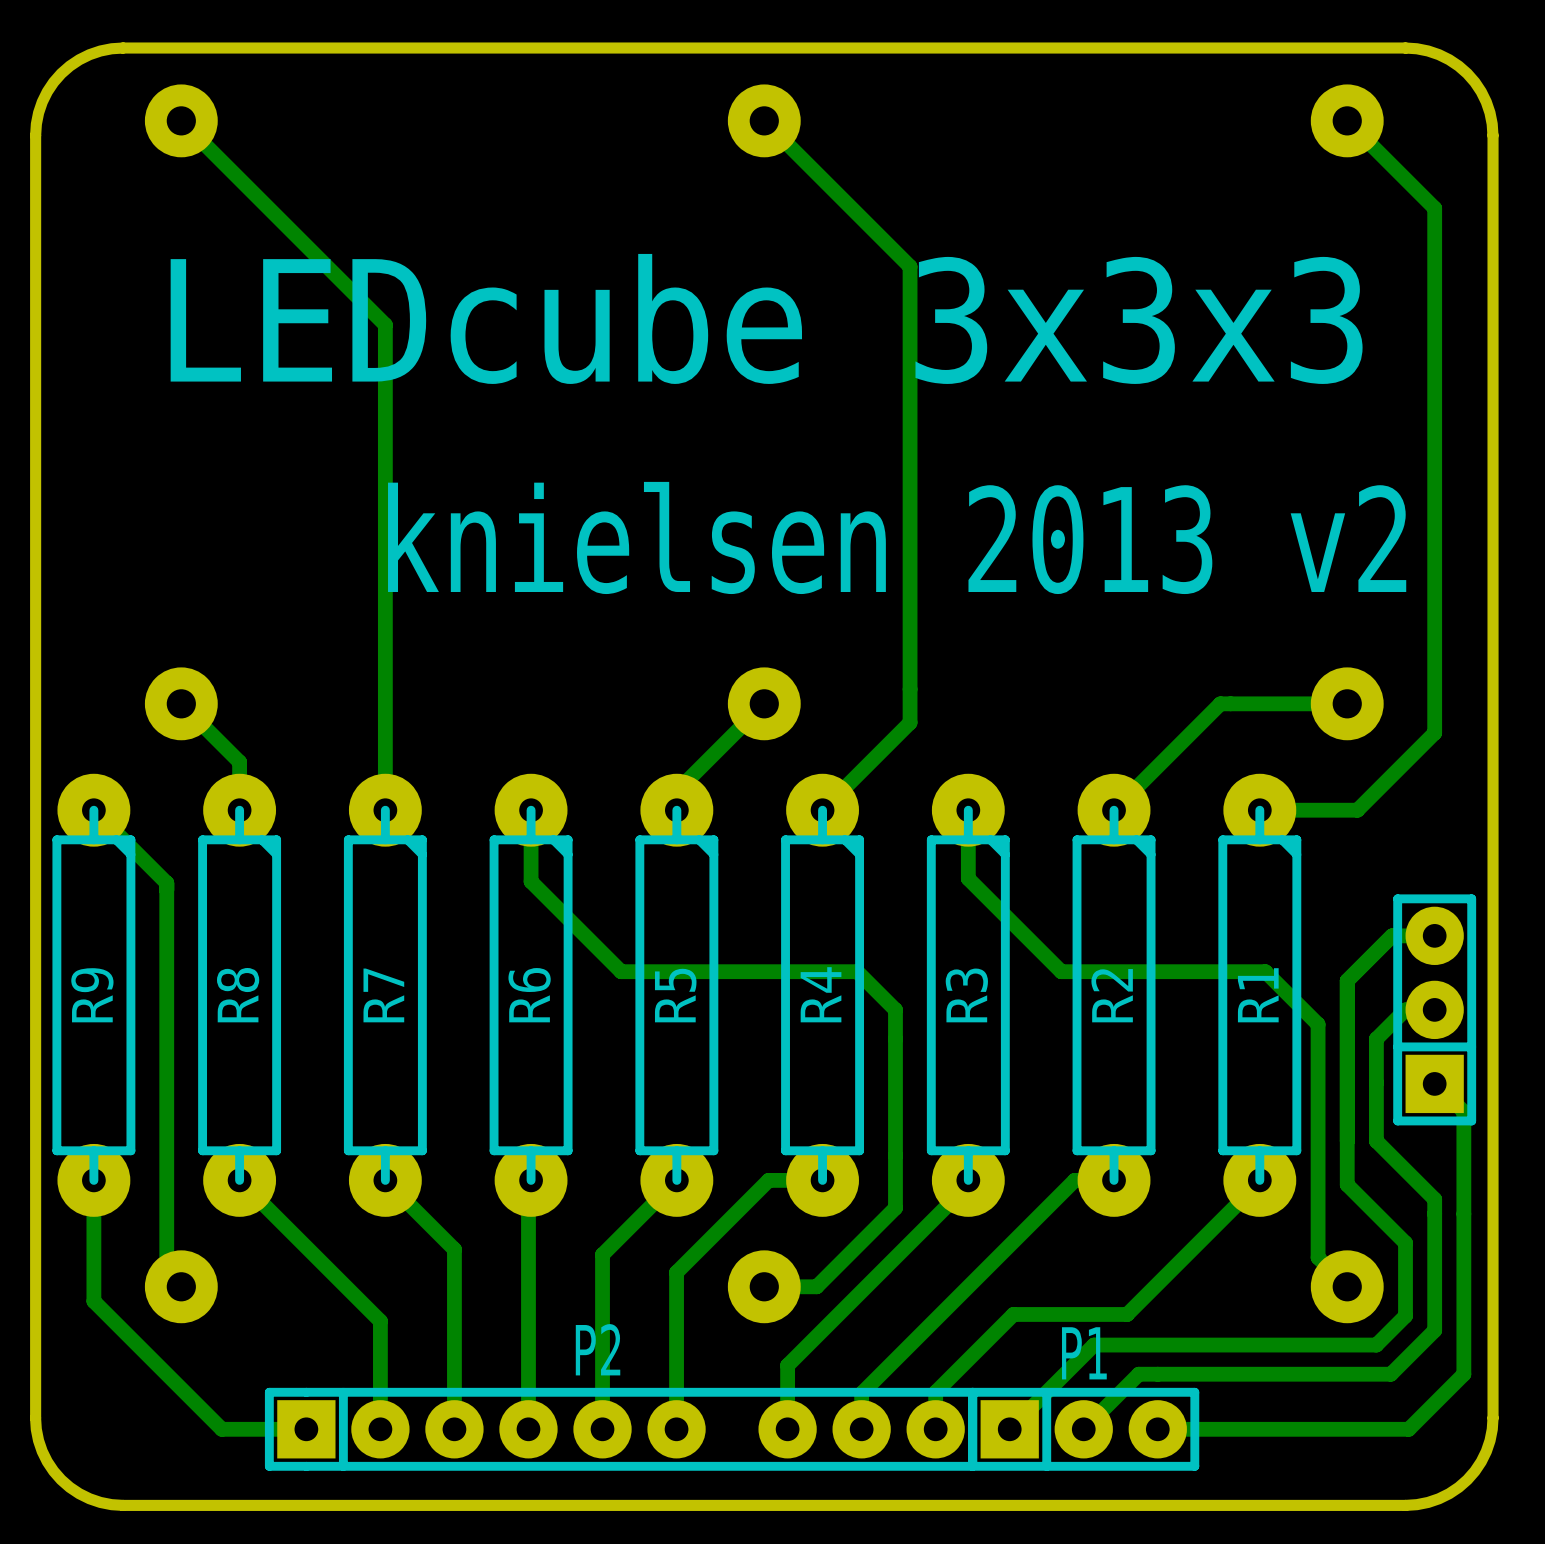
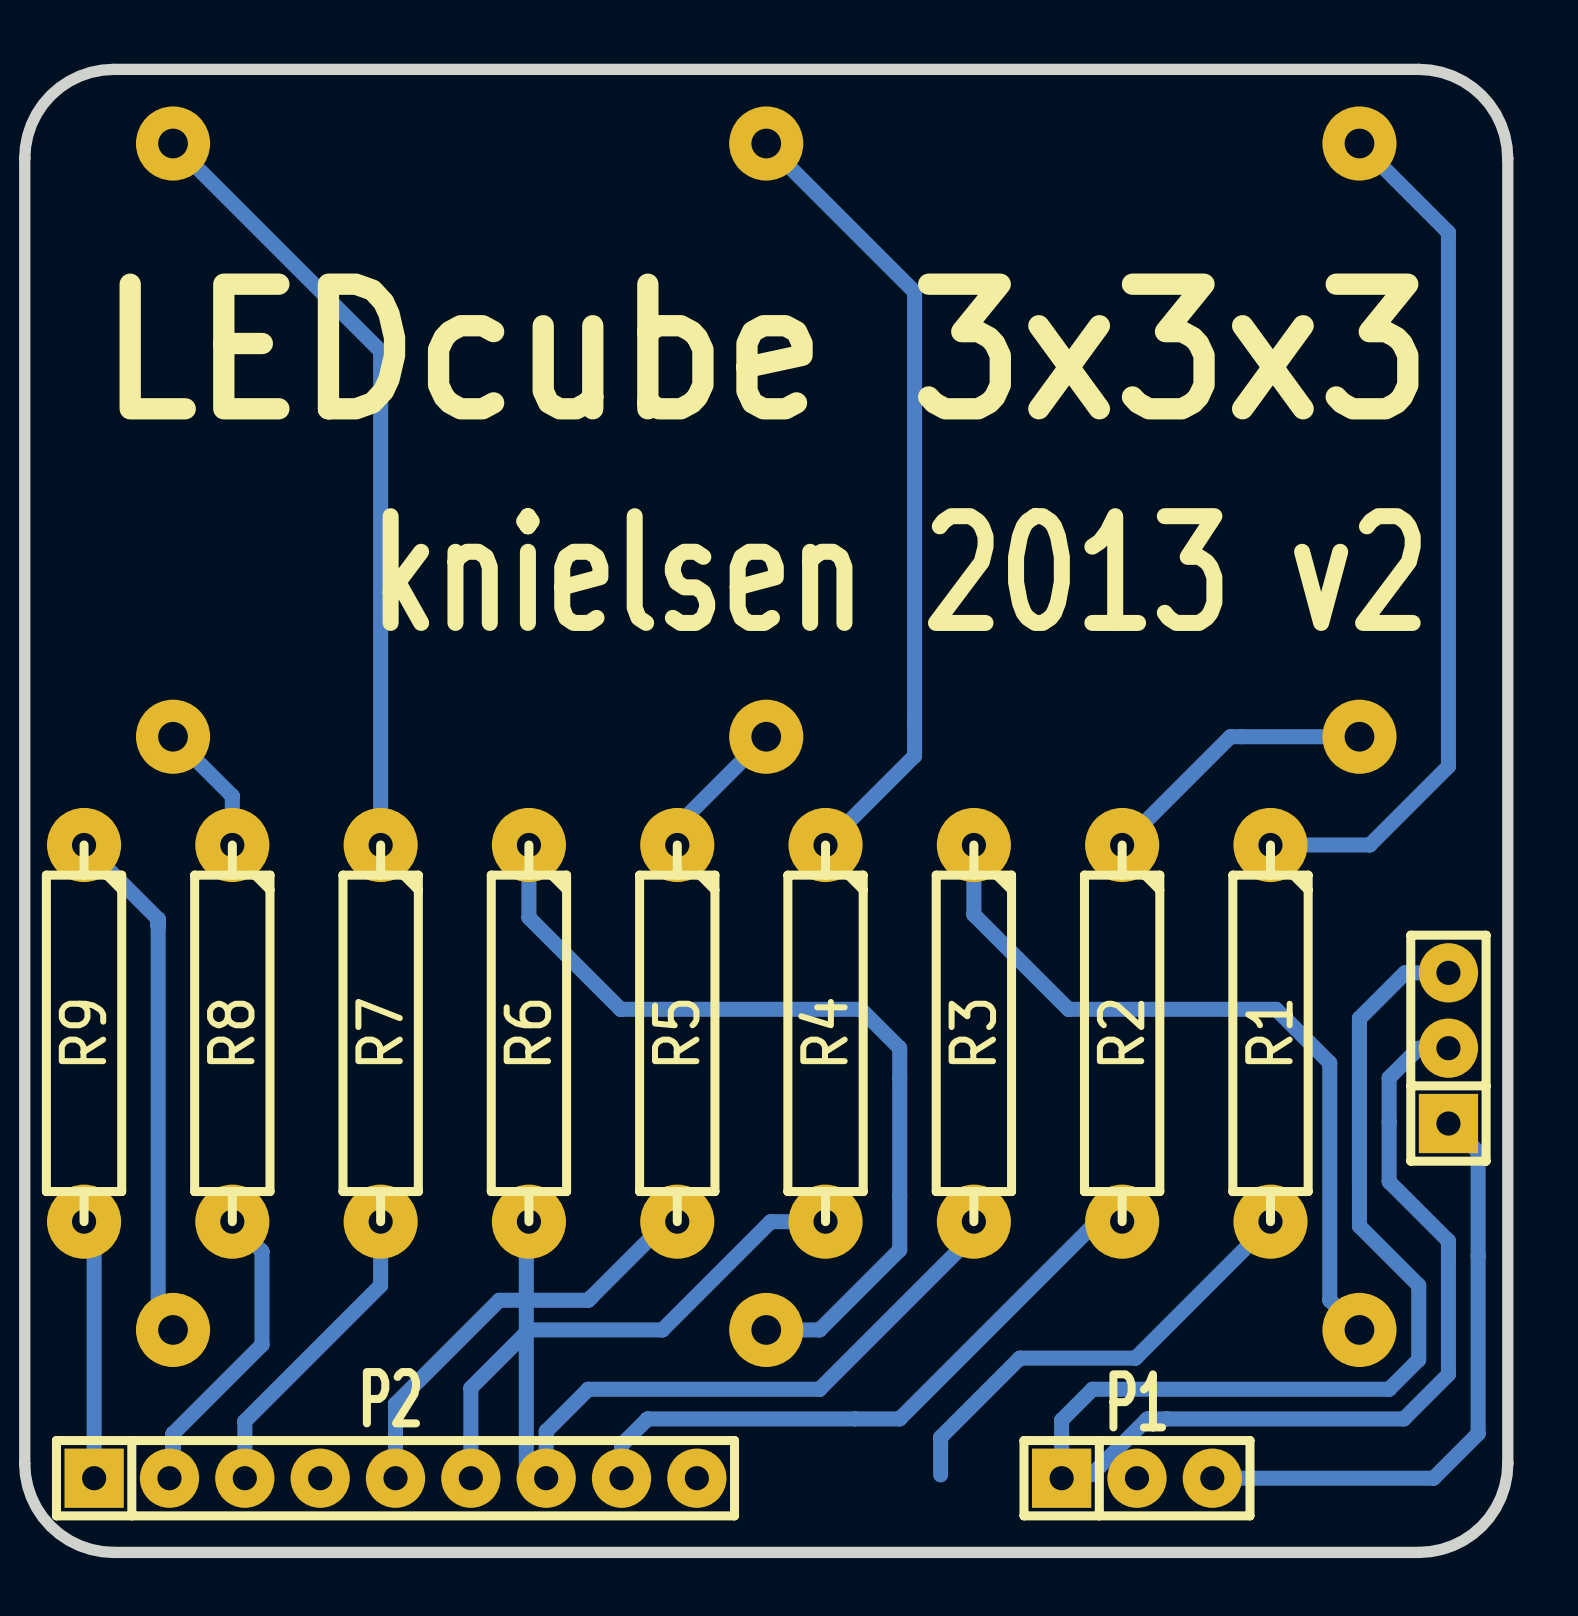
bottom track: (93, 1180) (93, 1301) (221, 1429) (306, 1429) -> (84, 1221) (94, 1231) (94, 1478)
bottom track: (385, 1180) (454, 1249) (454, 1429) -> (380, 1221) (380, 1285) (244, 1421) (244, 1478)
bottom track: (676, 1180) (602, 1254) (602, 1429) -> (677, 1221) (666, 1221) (588, 1300) (499, 1300) (395, 1404) (395, 1478)
bottom track: (1089, 1180) (1074, 1180) (861, 1393) (861, 1429) -> (1096, 1221) (899, 1418) (647, 1418) (621, 1444) (621, 1478)
bottom track: (968, 1184) (787, 1365) (787, 1429) -> (973, 1226) (973, 1234) (819, 1389)
bottom track: (268, 1209) (380, 1321) (380, 1429) -> (262, 1251) (262, 1344) (173, 1433) (173, 1474) (169, 1478)
bottom track: (676, 1272) (676, 1429) -> (676, 1315) (662, 1329) (528, 1329) (470, 1388) (470, 1478)
bottom track: none -> (819, 1389) (588, 1389) (546, 1431) (546, 1478)
bottom track: (1093, 1345) (1009, 1429) -> (1101, 1389) (1092, 1389) (1061, 1420) (1061, 1478)
bottom track: (1463, 1374) (1408, 1429) (1157, 1429) -> (1478, 1418) (1478, 1433) (1433, 1478) (1212, 1478)
P2 footprint: [264, 1387, 978, 1471] -> [51, 1436, 740, 1521]
P1 position: (1083, 1429) -> (1136, 1478)

